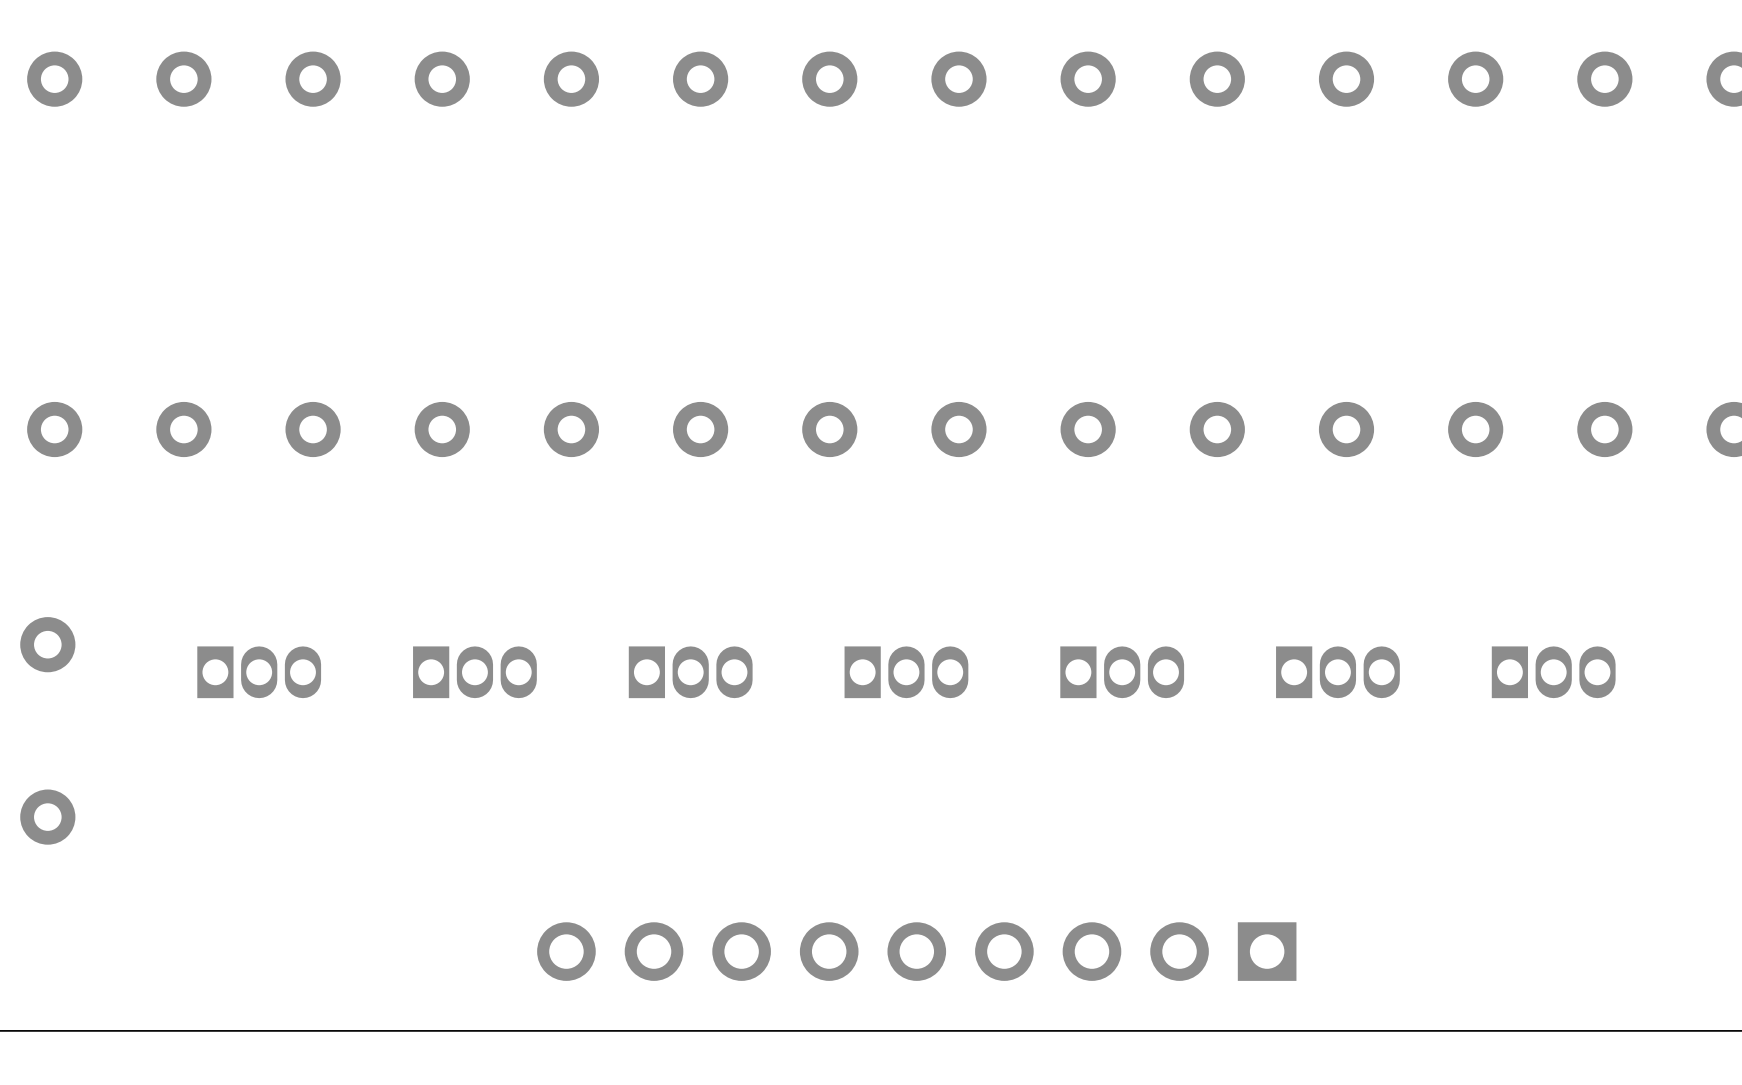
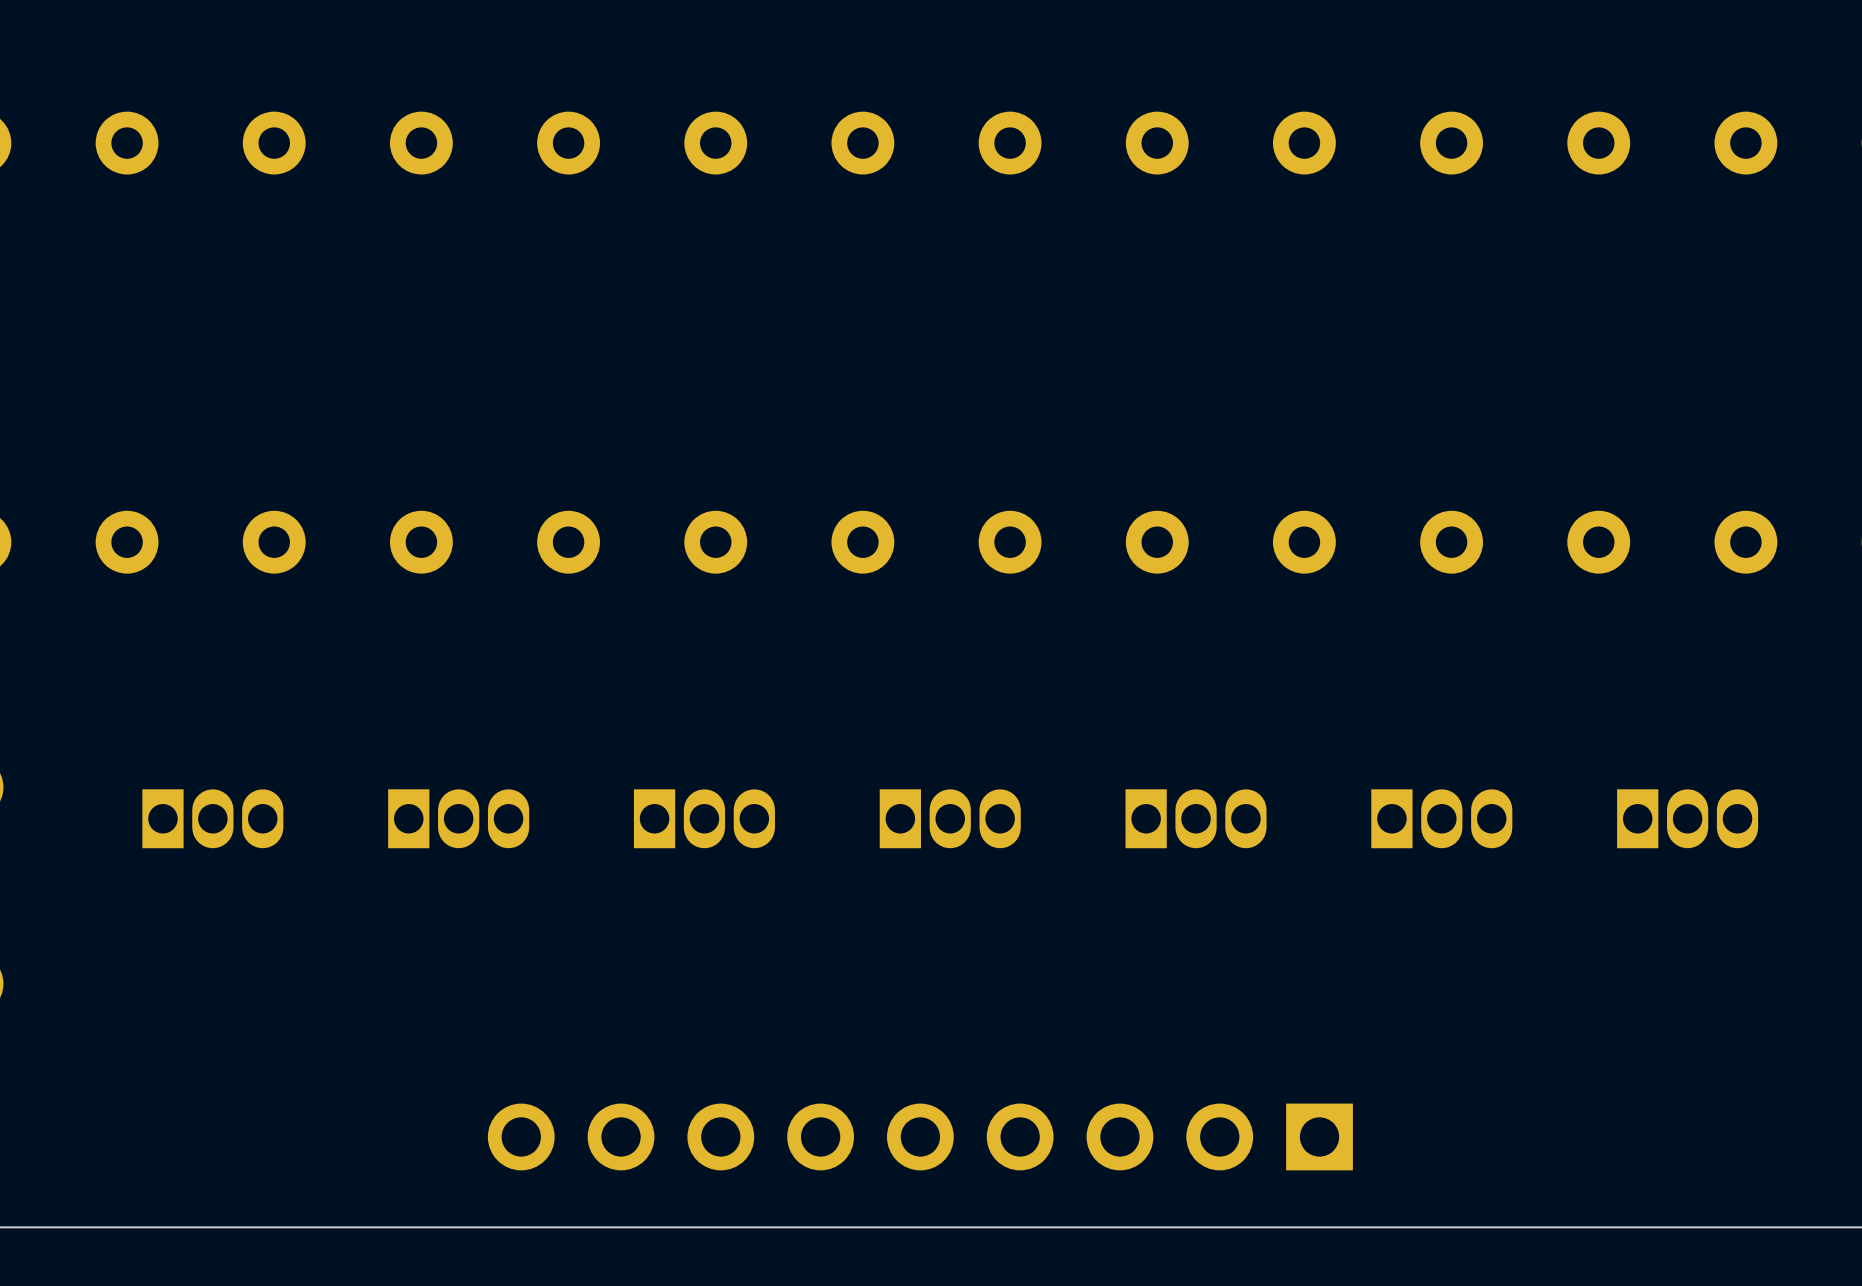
part position: (916, 951) -> (920, 1136)

